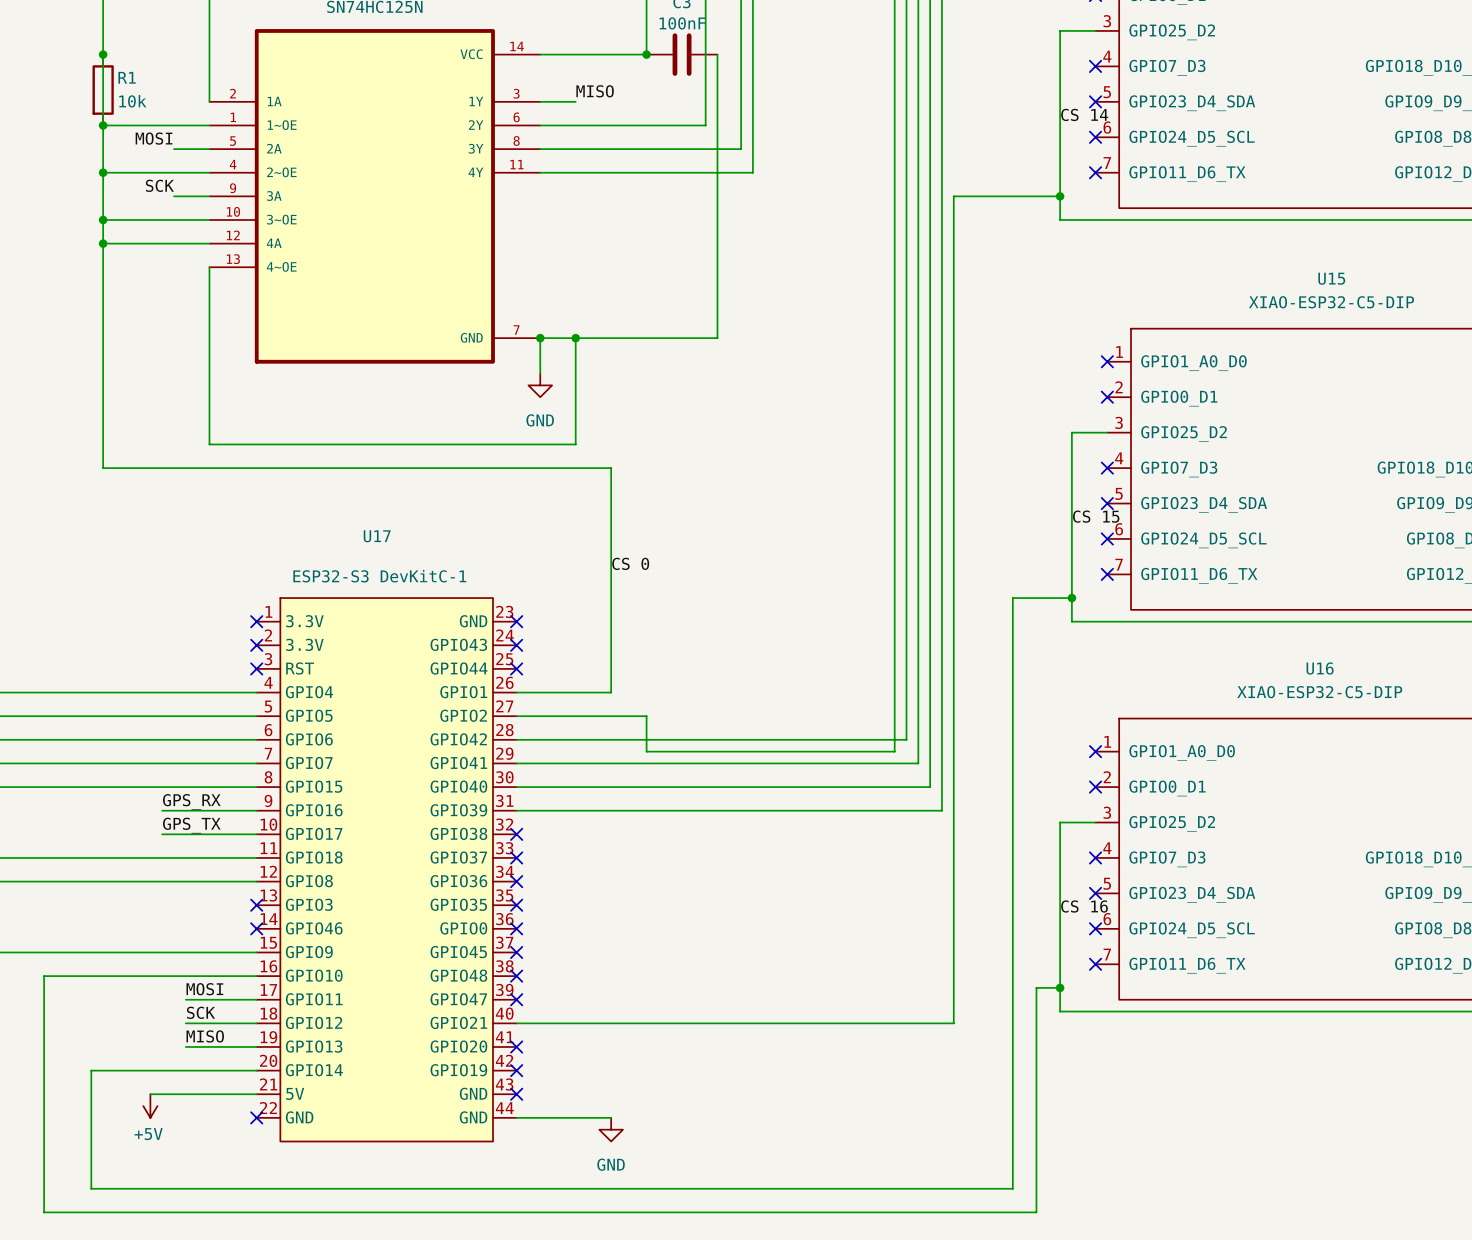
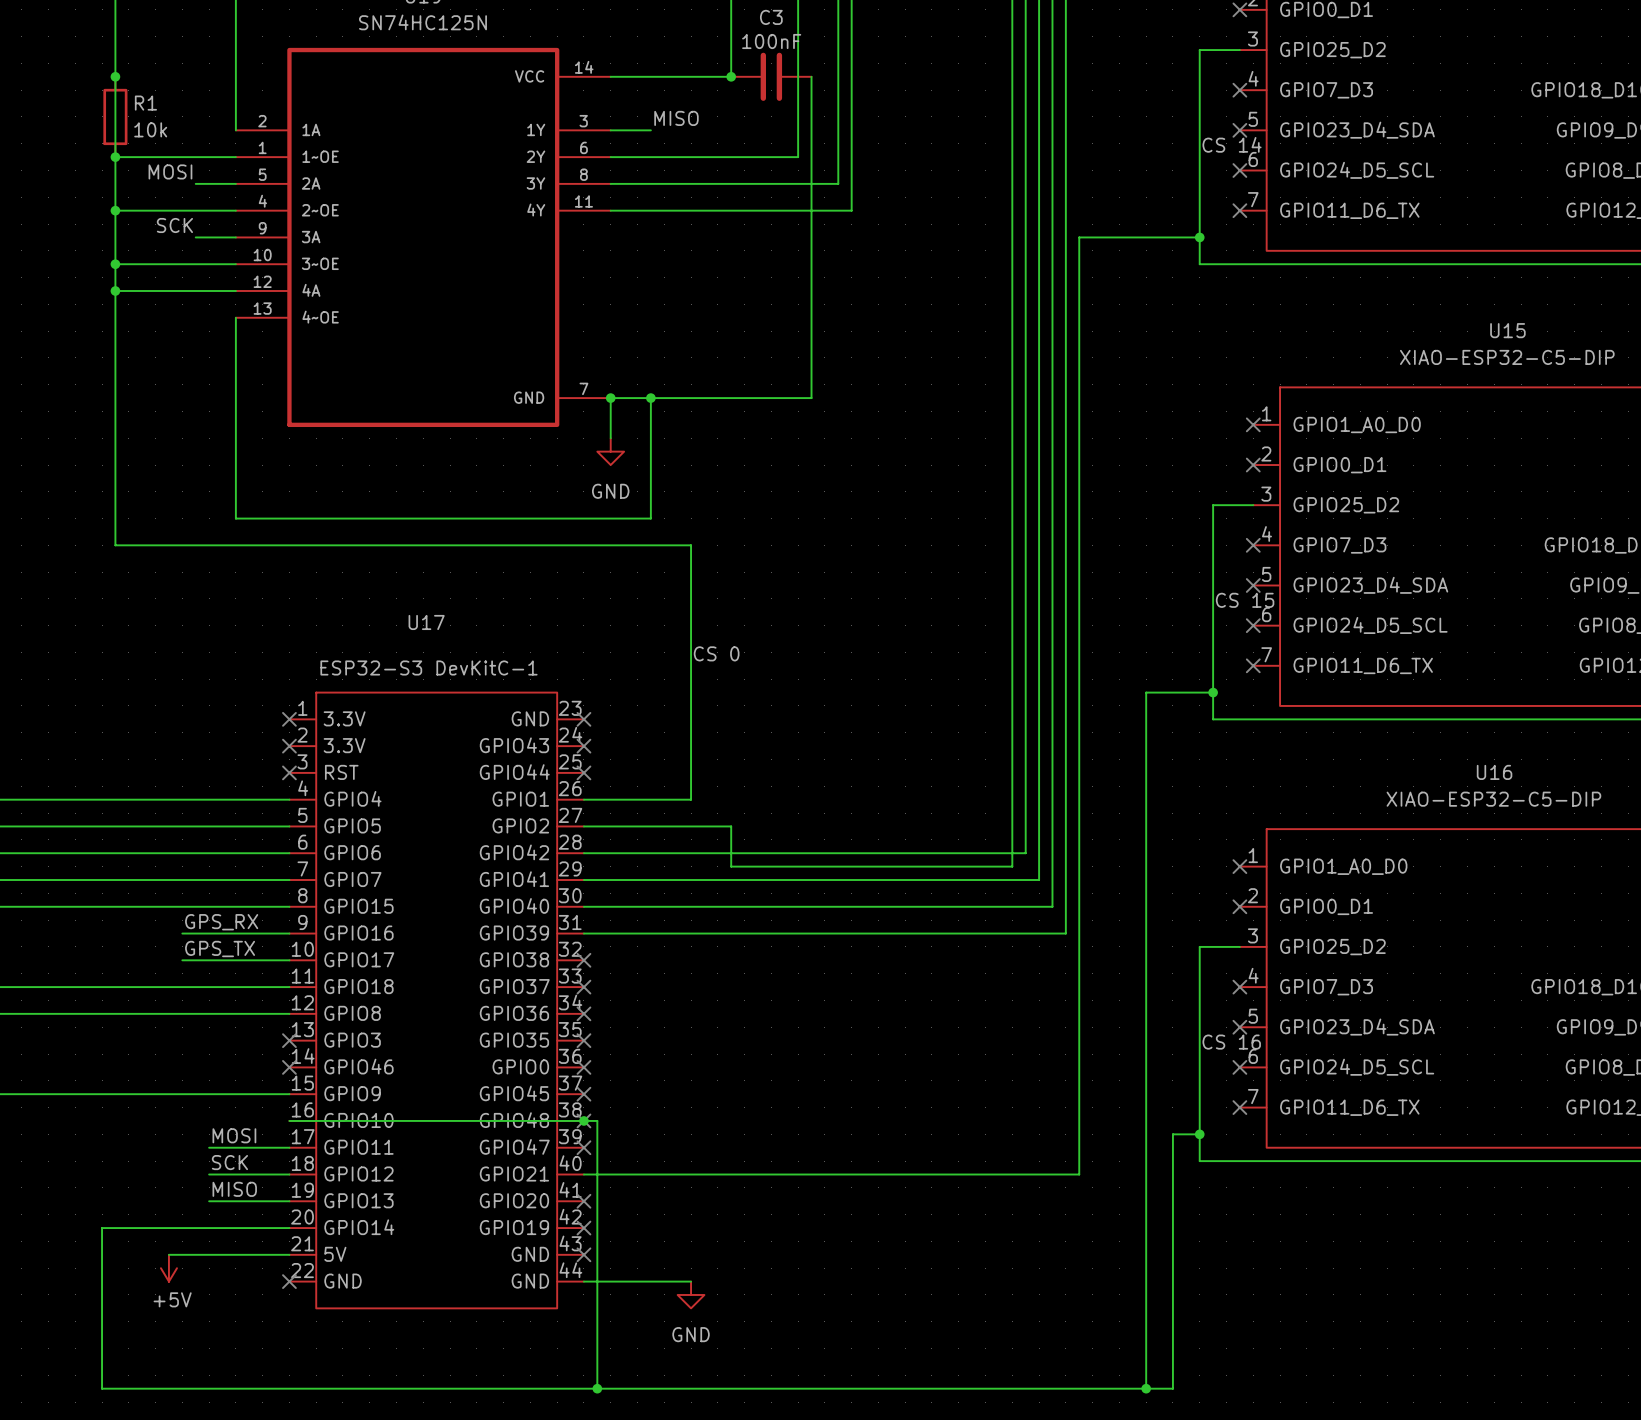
wire: (256, 976) (44, 976) (44, 1212) (91, 1212) -> (102, 1361) (102, 1388)
wire: none -> (289, 1120) (597, 1120) (597, 1388)
junction: none -> (583, 1120)
wire: (91, 1188) (1012, 1188) -> (1146, 1388) (1146, 1361)
junction: none -> (597, 1388)
junction: none -> (1146, 1388)

